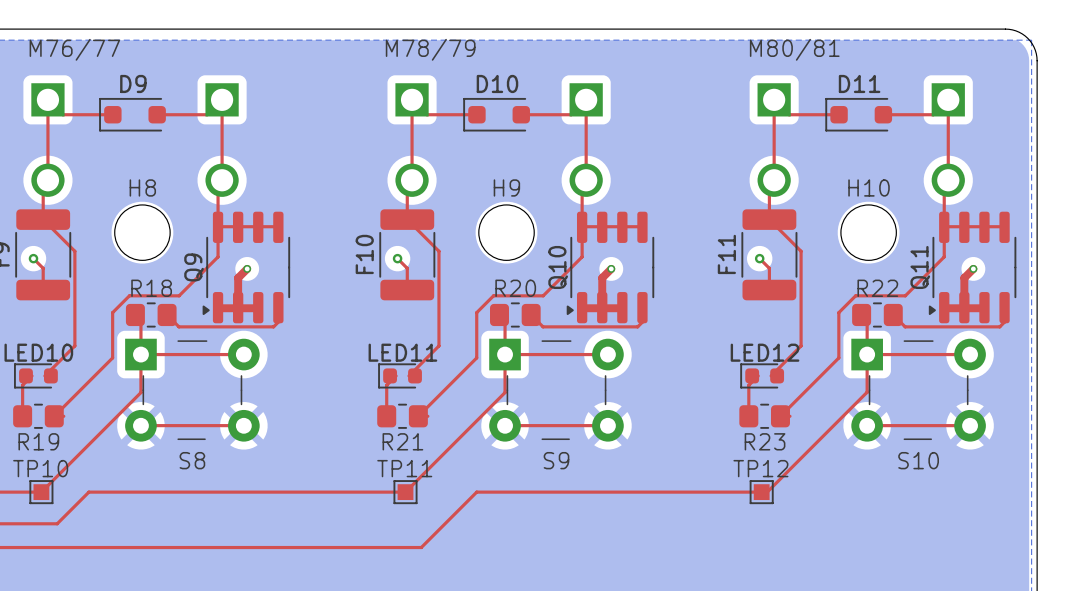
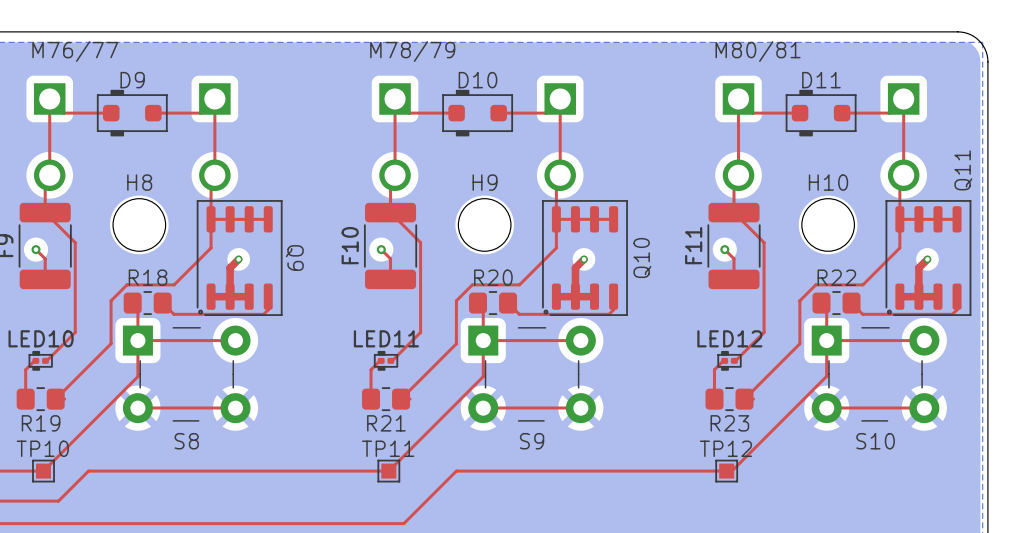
D9 footprint: [99, 97, 166, 132] -> [96, 89, 168, 137]
D10 footprint: [463, 97, 530, 132] -> [442, 89, 514, 137]
D11 footprint: [825, 97, 893, 132] -> [785, 89, 857, 137]
Q9 footprint: [202, 211, 291, 324] -> [196, 200, 283, 316]
Q10 footprint: [566, 211, 655, 324] -> [542, 200, 628, 316]
Q11 footprint: [928, 211, 1017, 324] -> [885, 200, 972, 316]
Q9 name position: Q9 (194, 267) -> Q9 (294, 258)
Q10 name position: Q10 (558, 267) -> Q10 (642, 258)
Q11 name position: Q11 (920, 267) -> Q11 (963, 170)
LED10 footprint: [13, 363, 58, 389] -> [28, 350, 53, 371]
LED11 footprint: [378, 363, 422, 389] -> [373, 350, 399, 371]
LED12 footprint: [740, 363, 785, 389] -> [717, 350, 742, 371]

